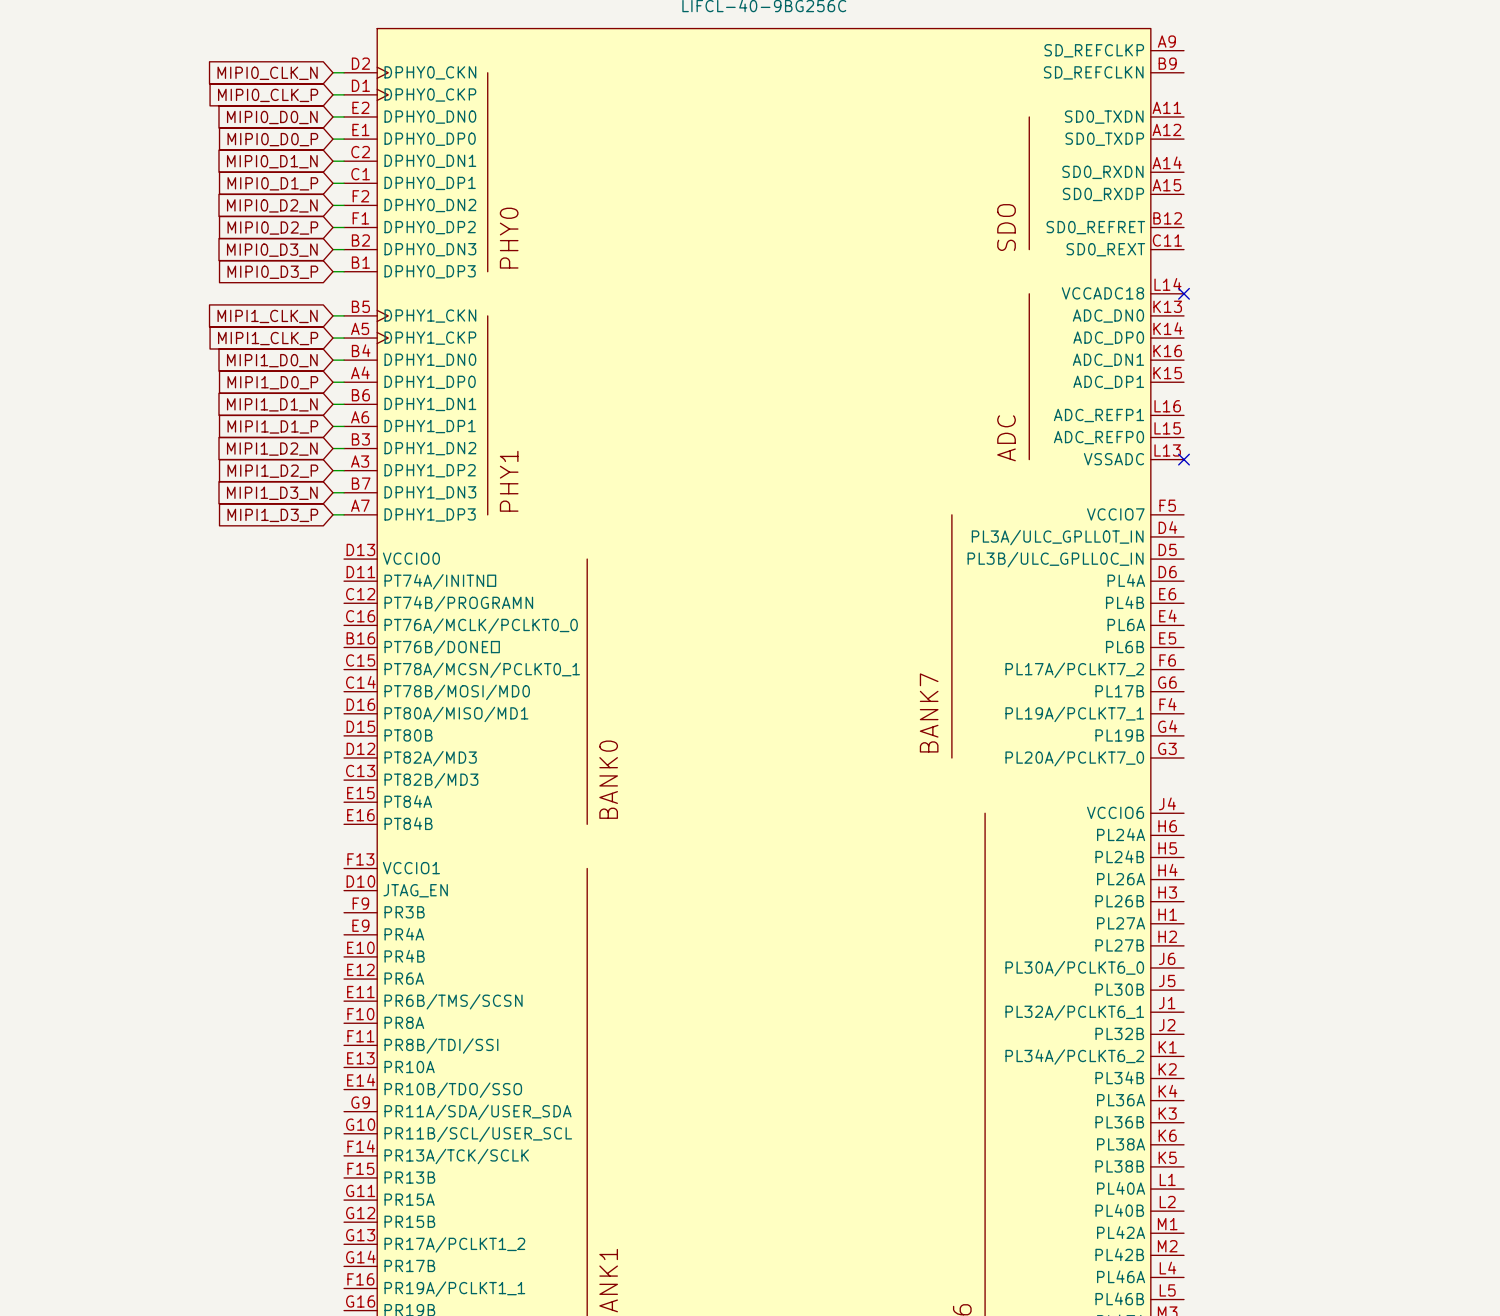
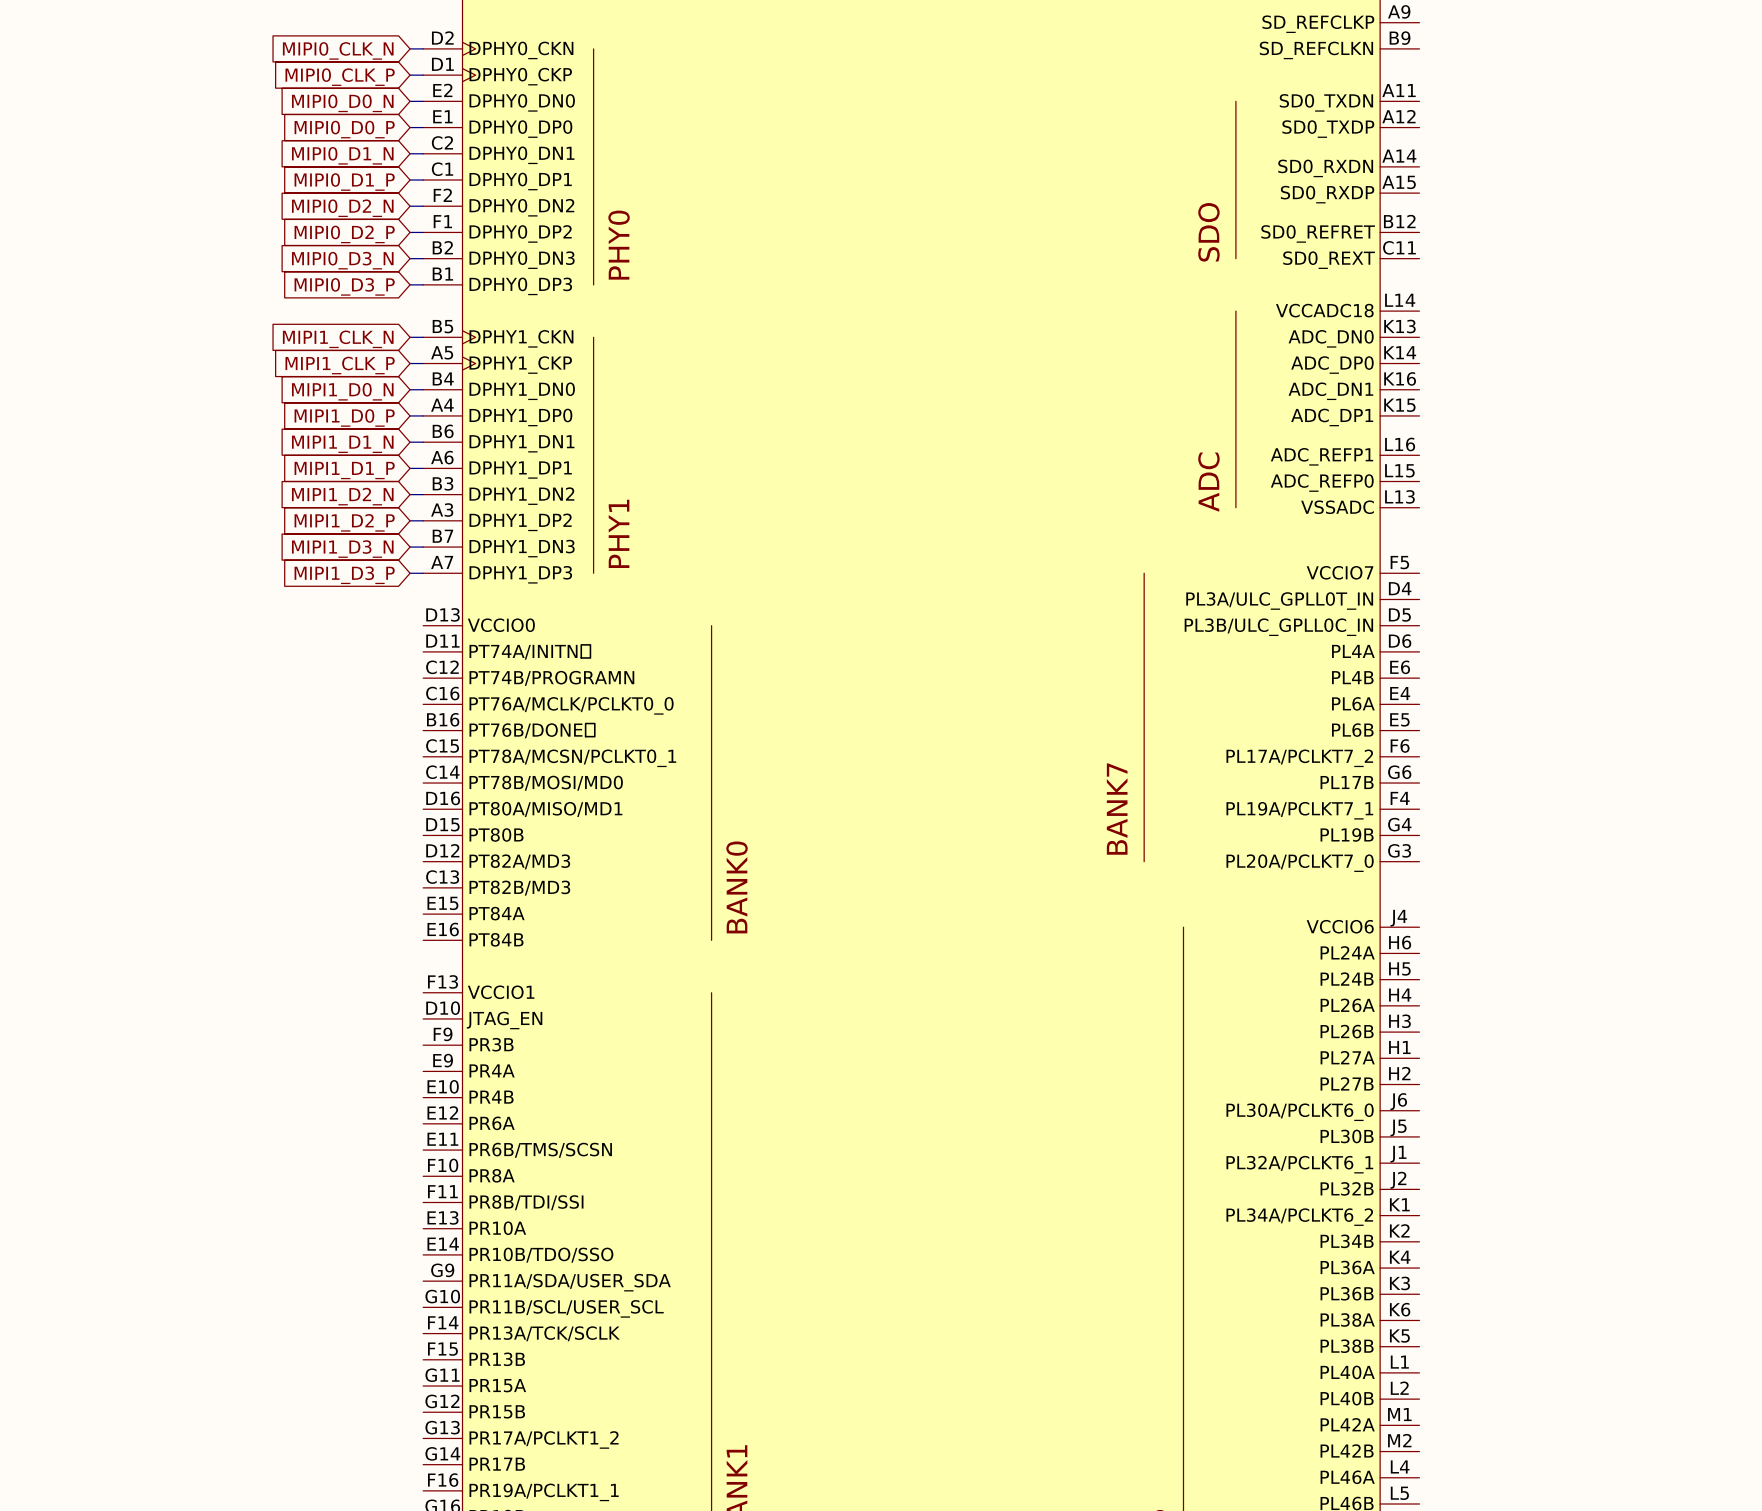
no-connect mark: (1184, 293) -> none
no-connect mark: (1184, 459) -> none

